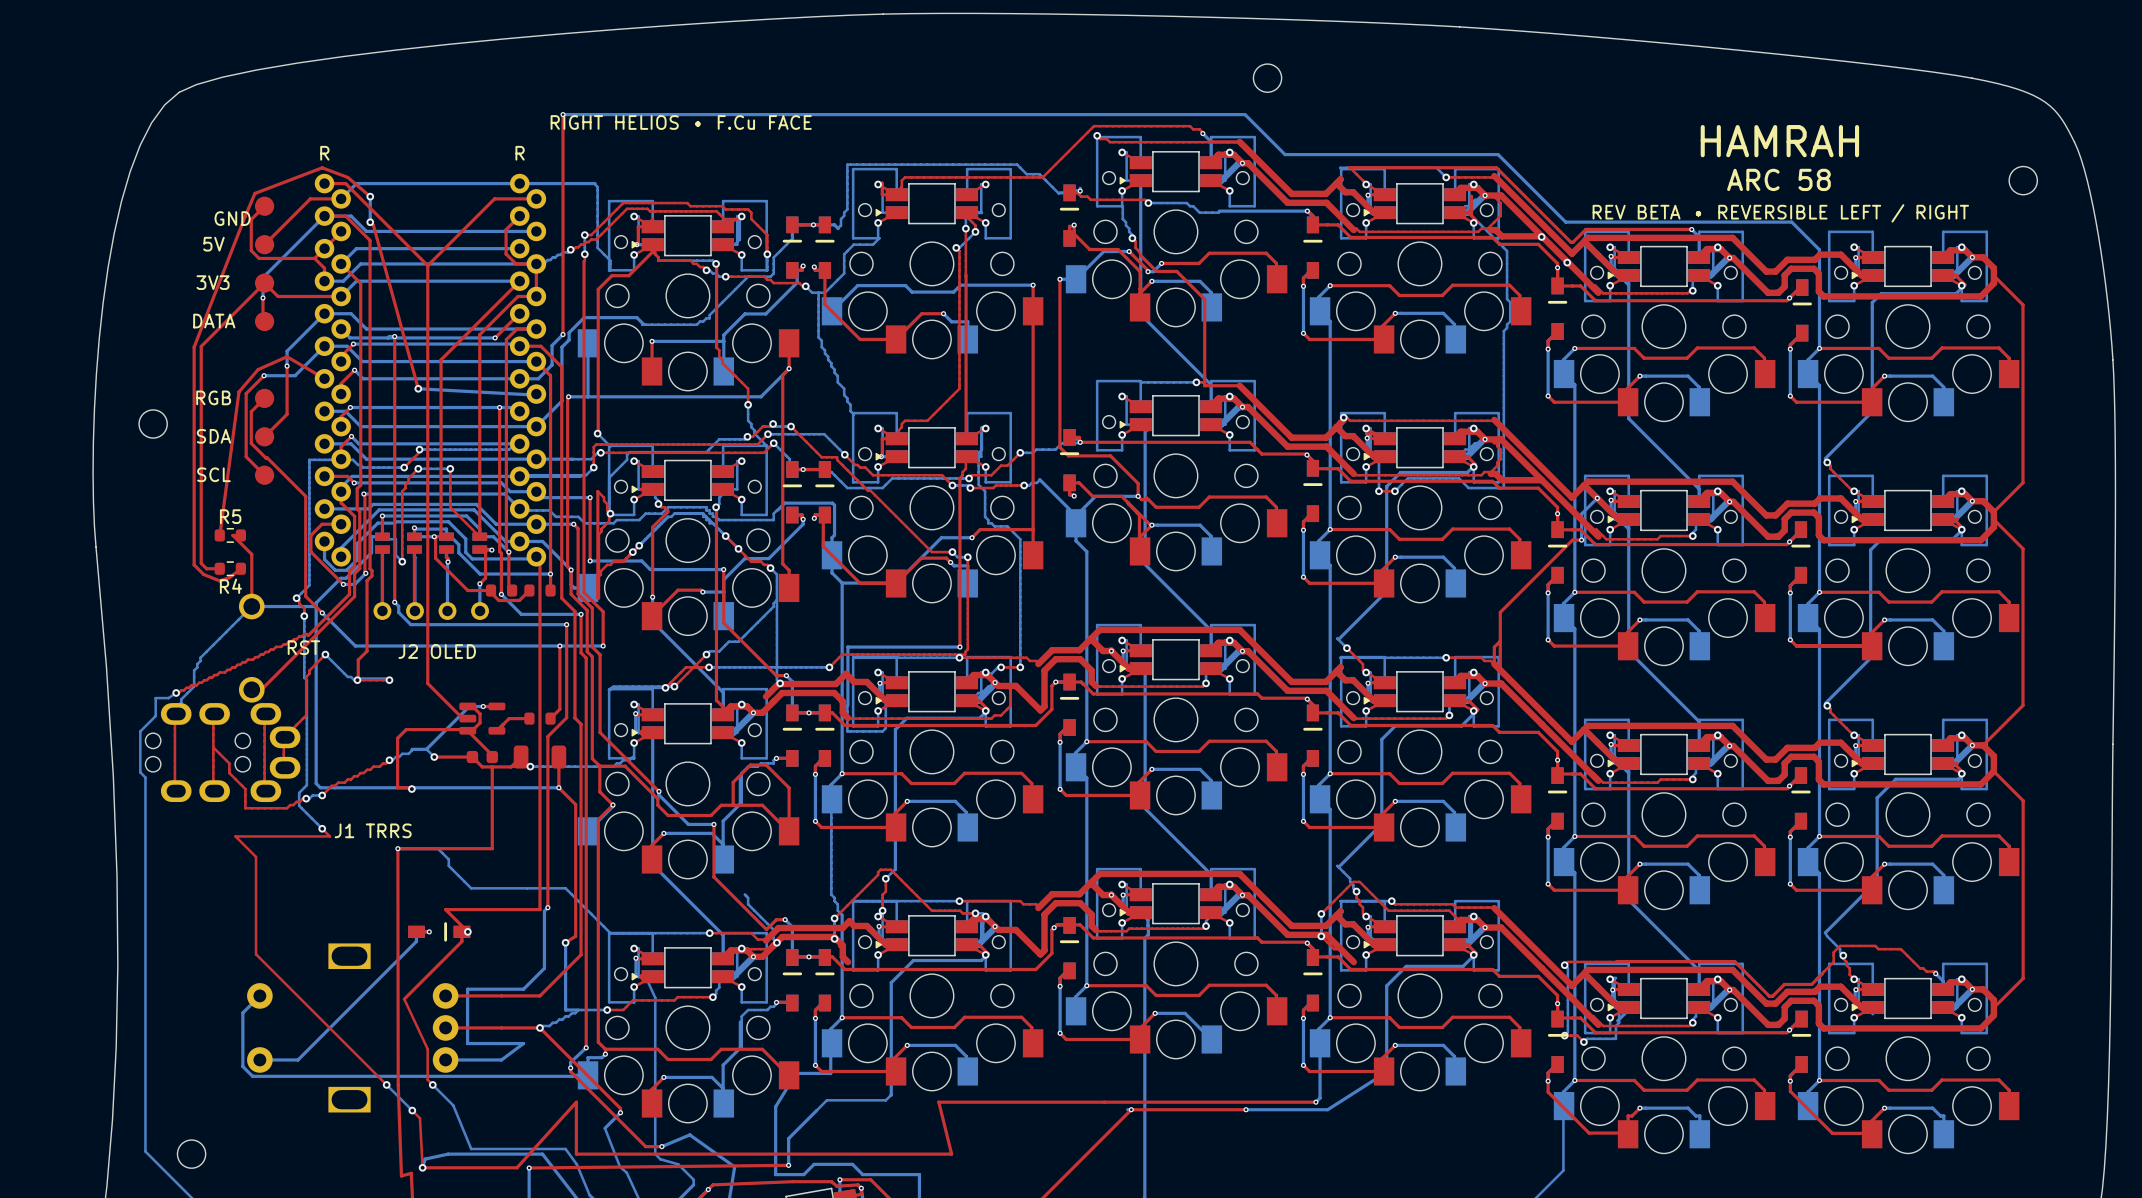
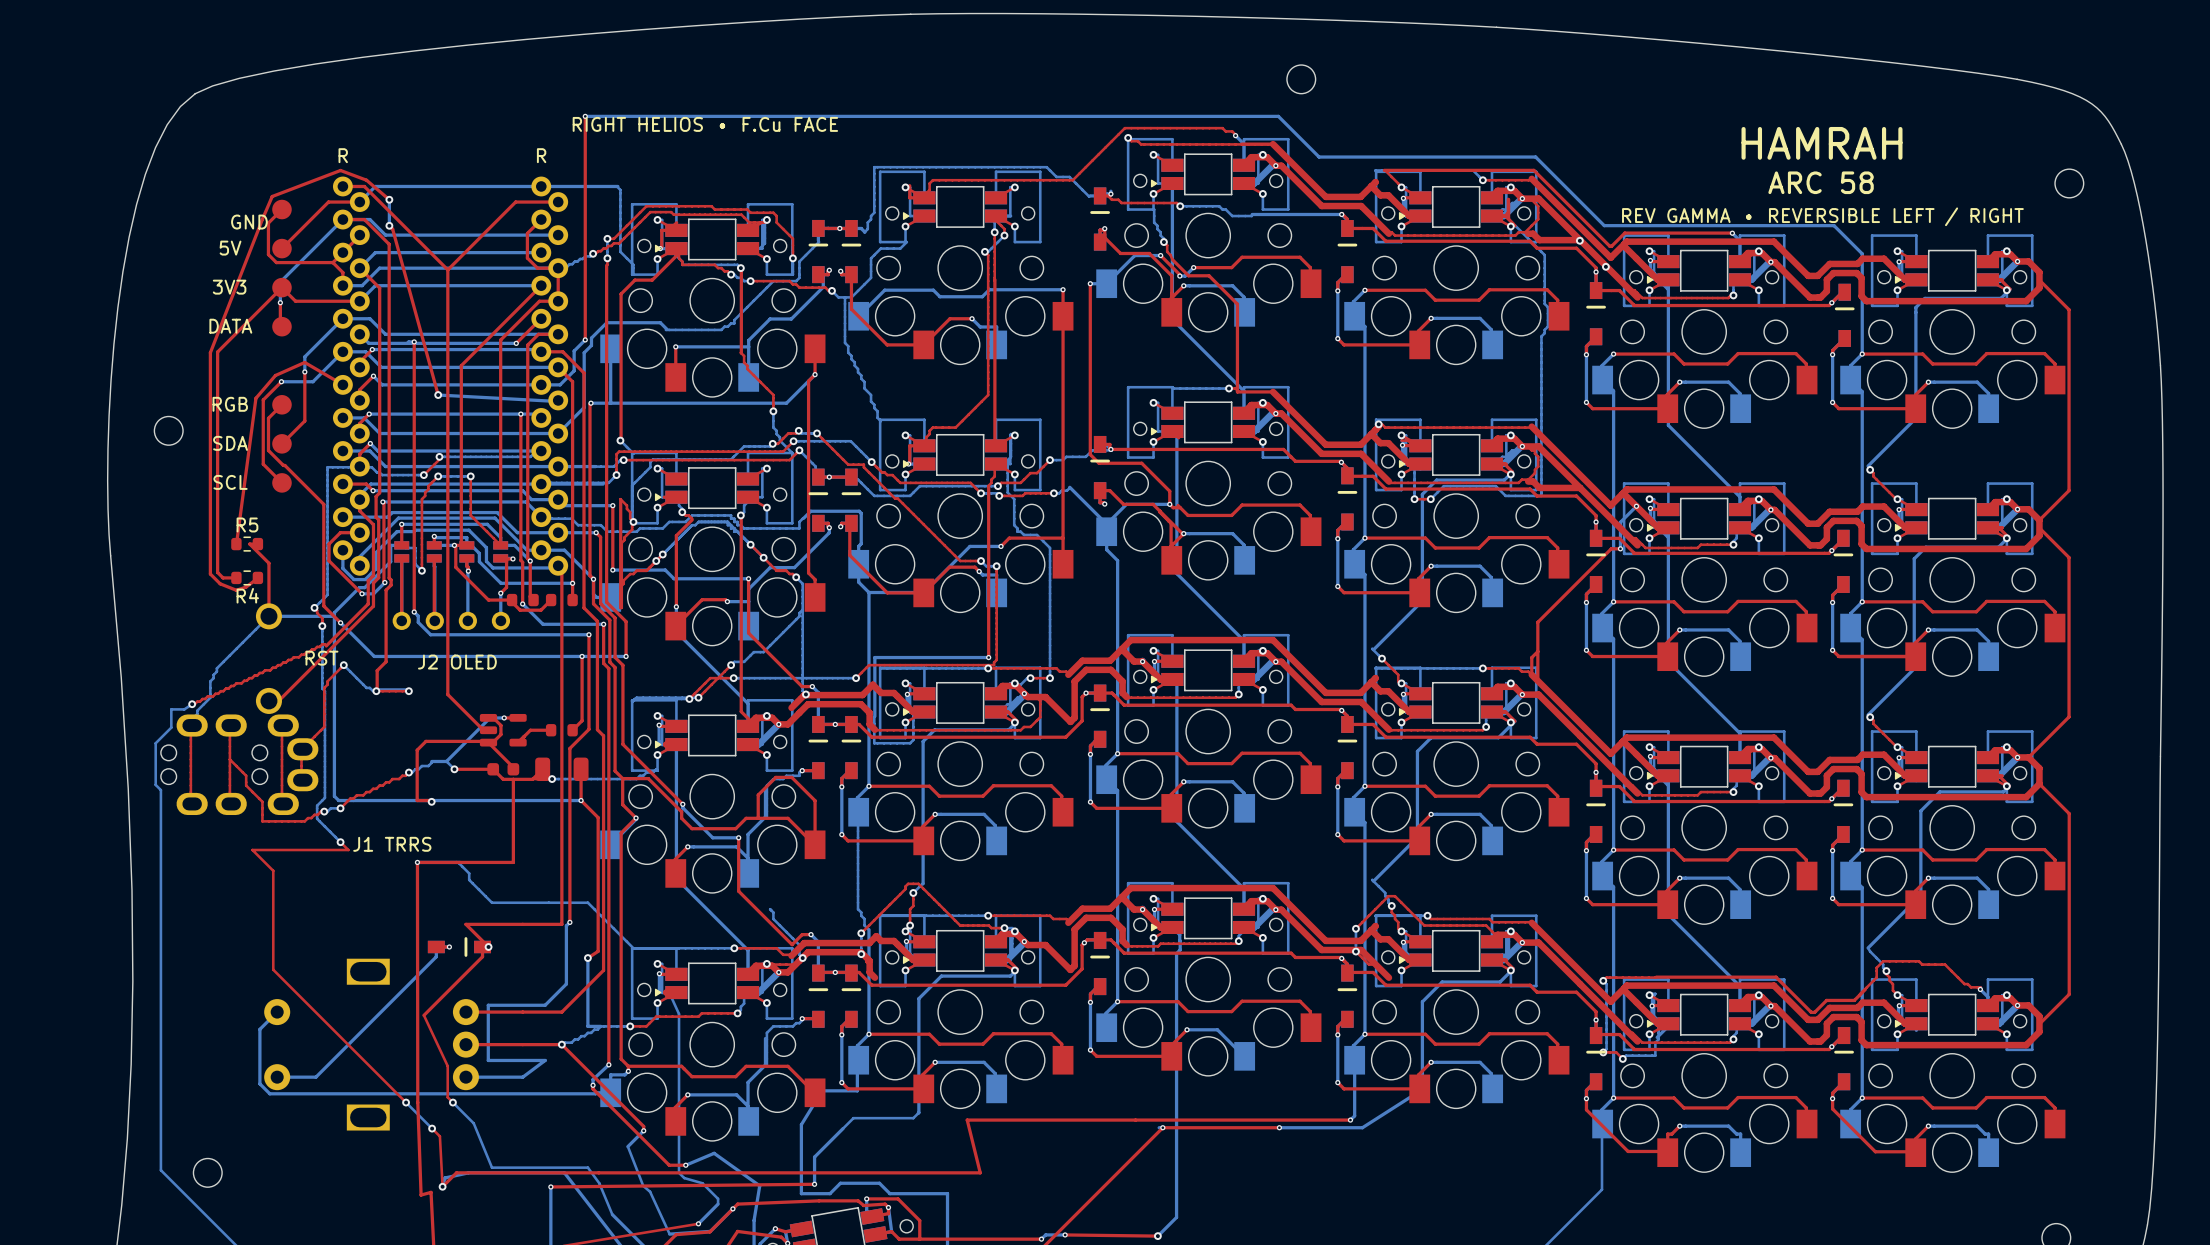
text: REV BETA • REVERSIBLE LEFT / RIGHT (1780, 213) -> REV GAMMA • REVERSIBLE LEFT / RIGHT (1822, 216)
top track: (576, 1154) (576, 1102) (516, 1167) (422, 1167) -> (598, 1172) (456, 1172) (442, 1186)

